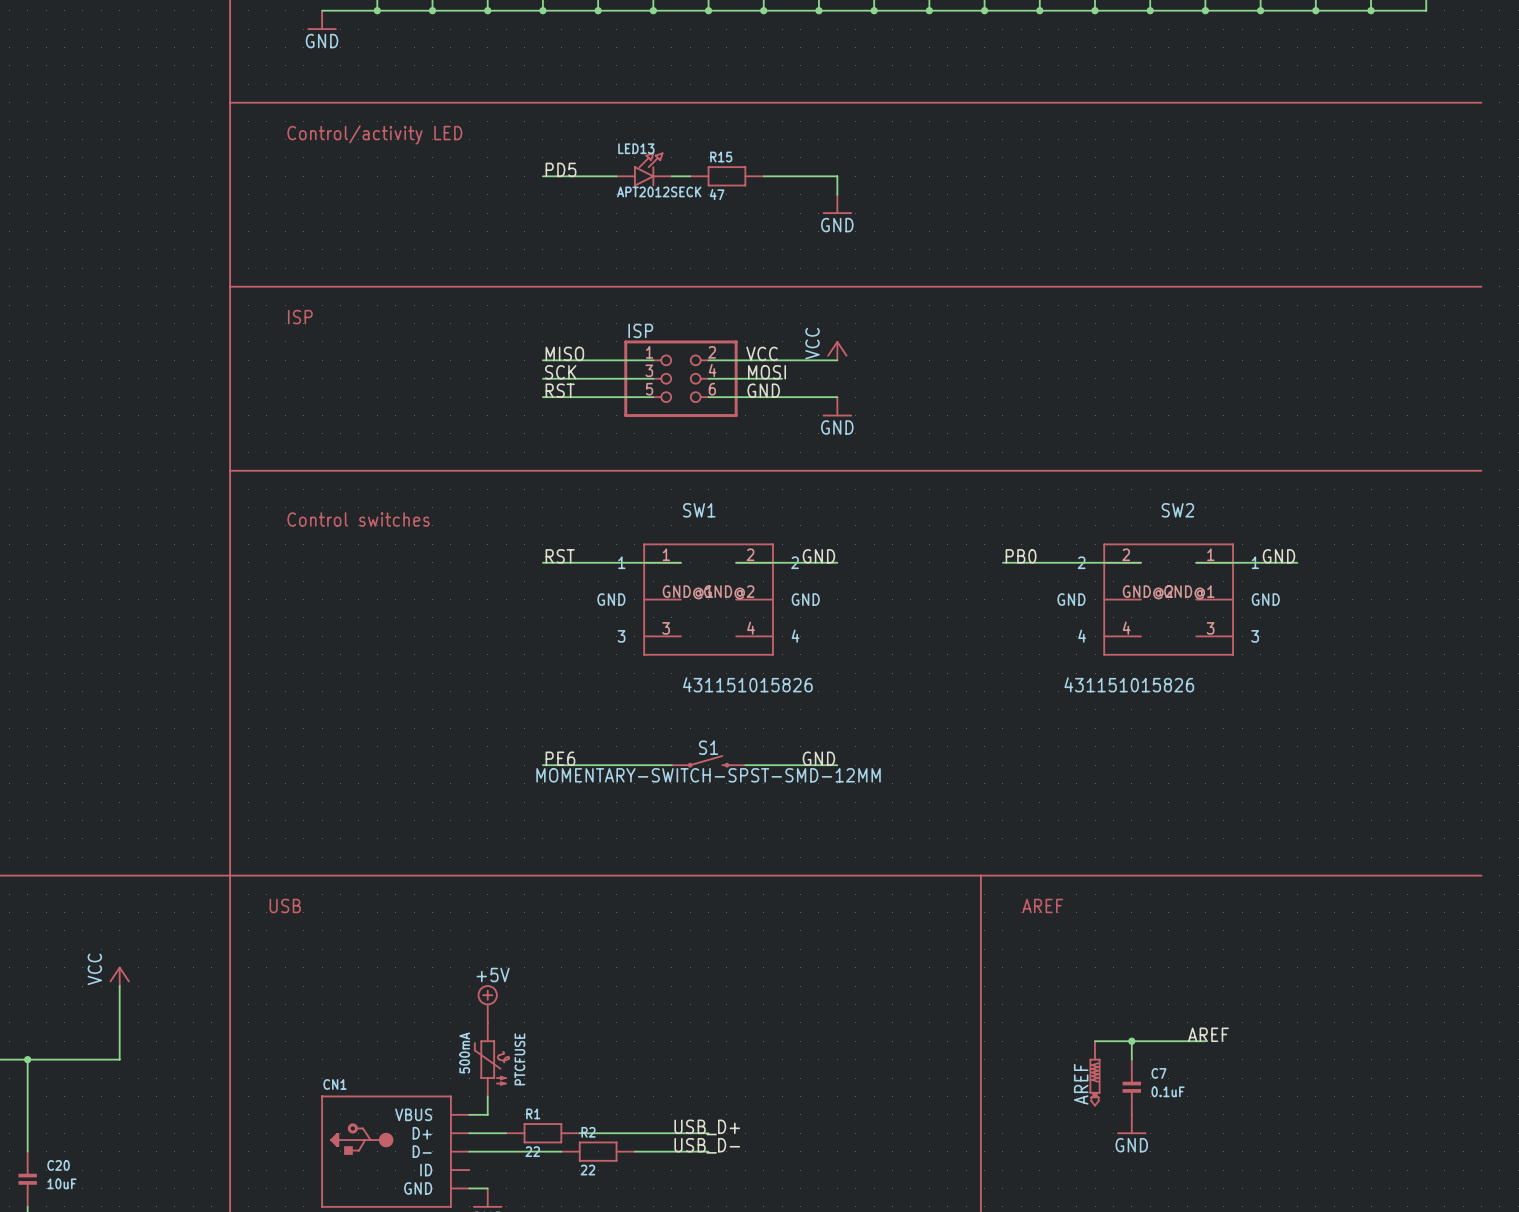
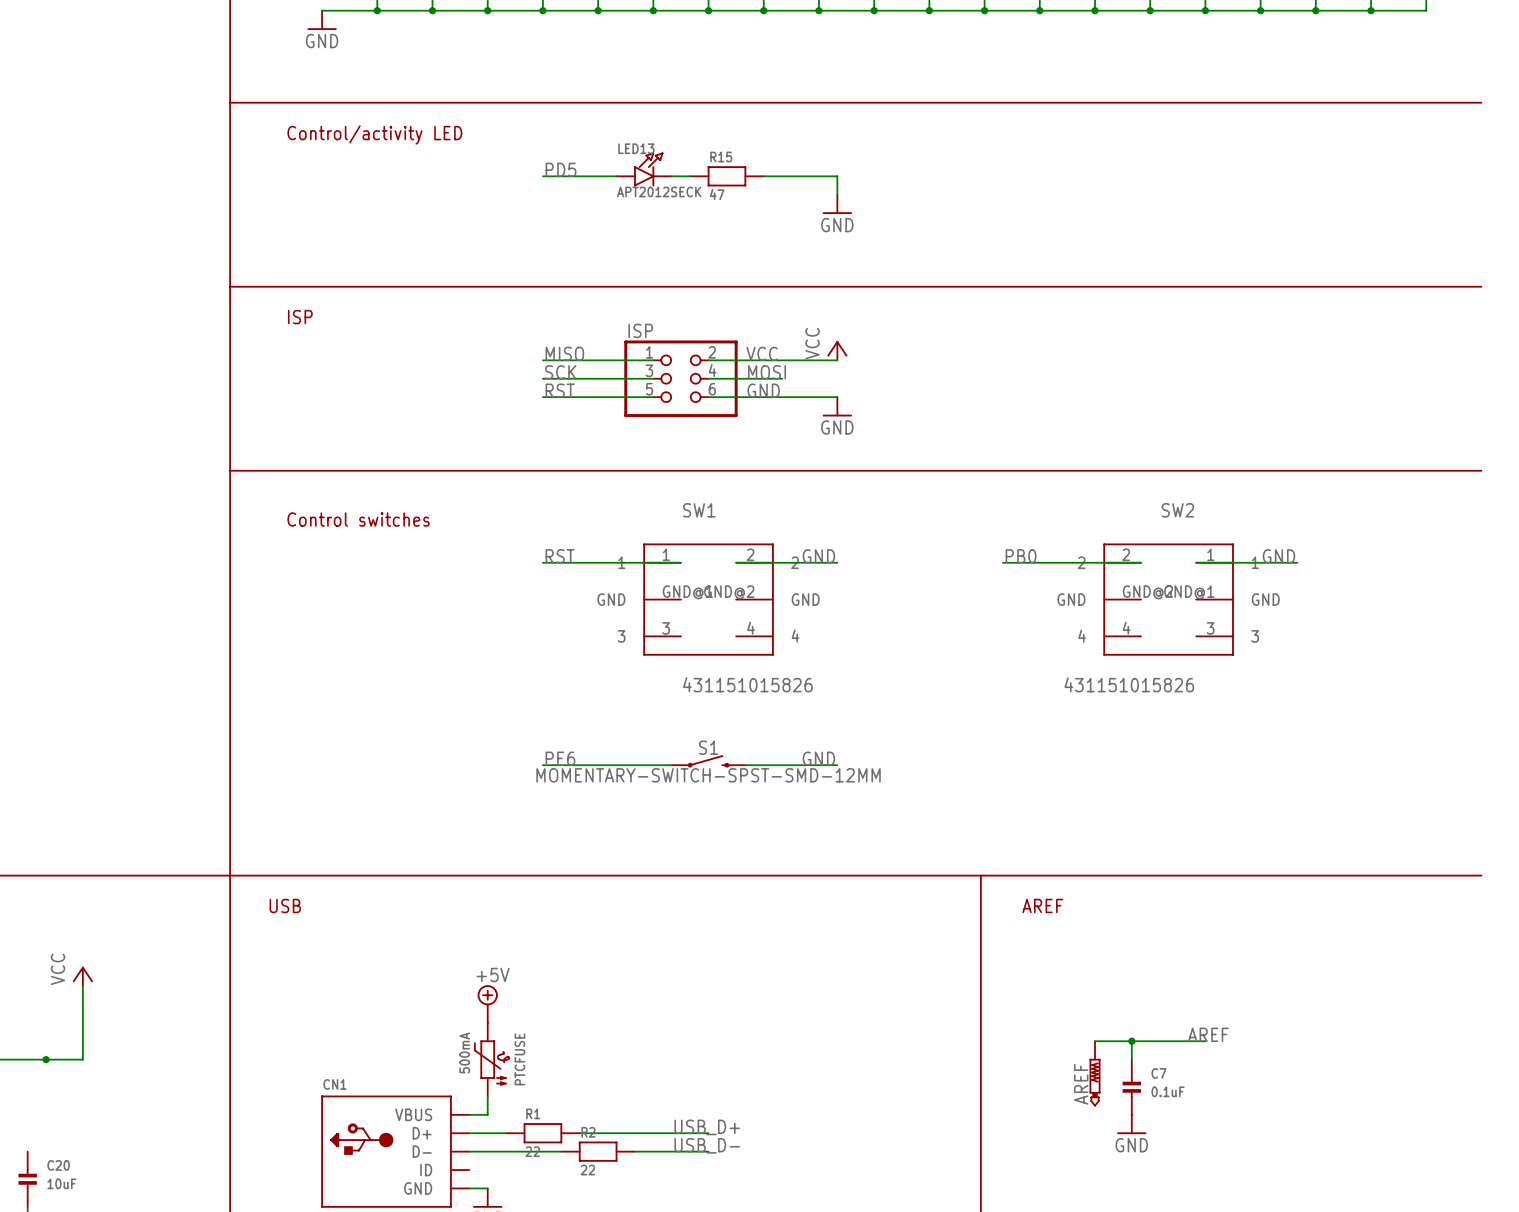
power symbol position: VCC (119, 976) -> VCC (82, 976)
wire: (119, 986) (119, 1059) (82, 1059) -> (82, 986) (82, 1059)
wire: (27, 1059) (27, 1151) -> none
junction position: (27, 1059) -> (46, 1059)

